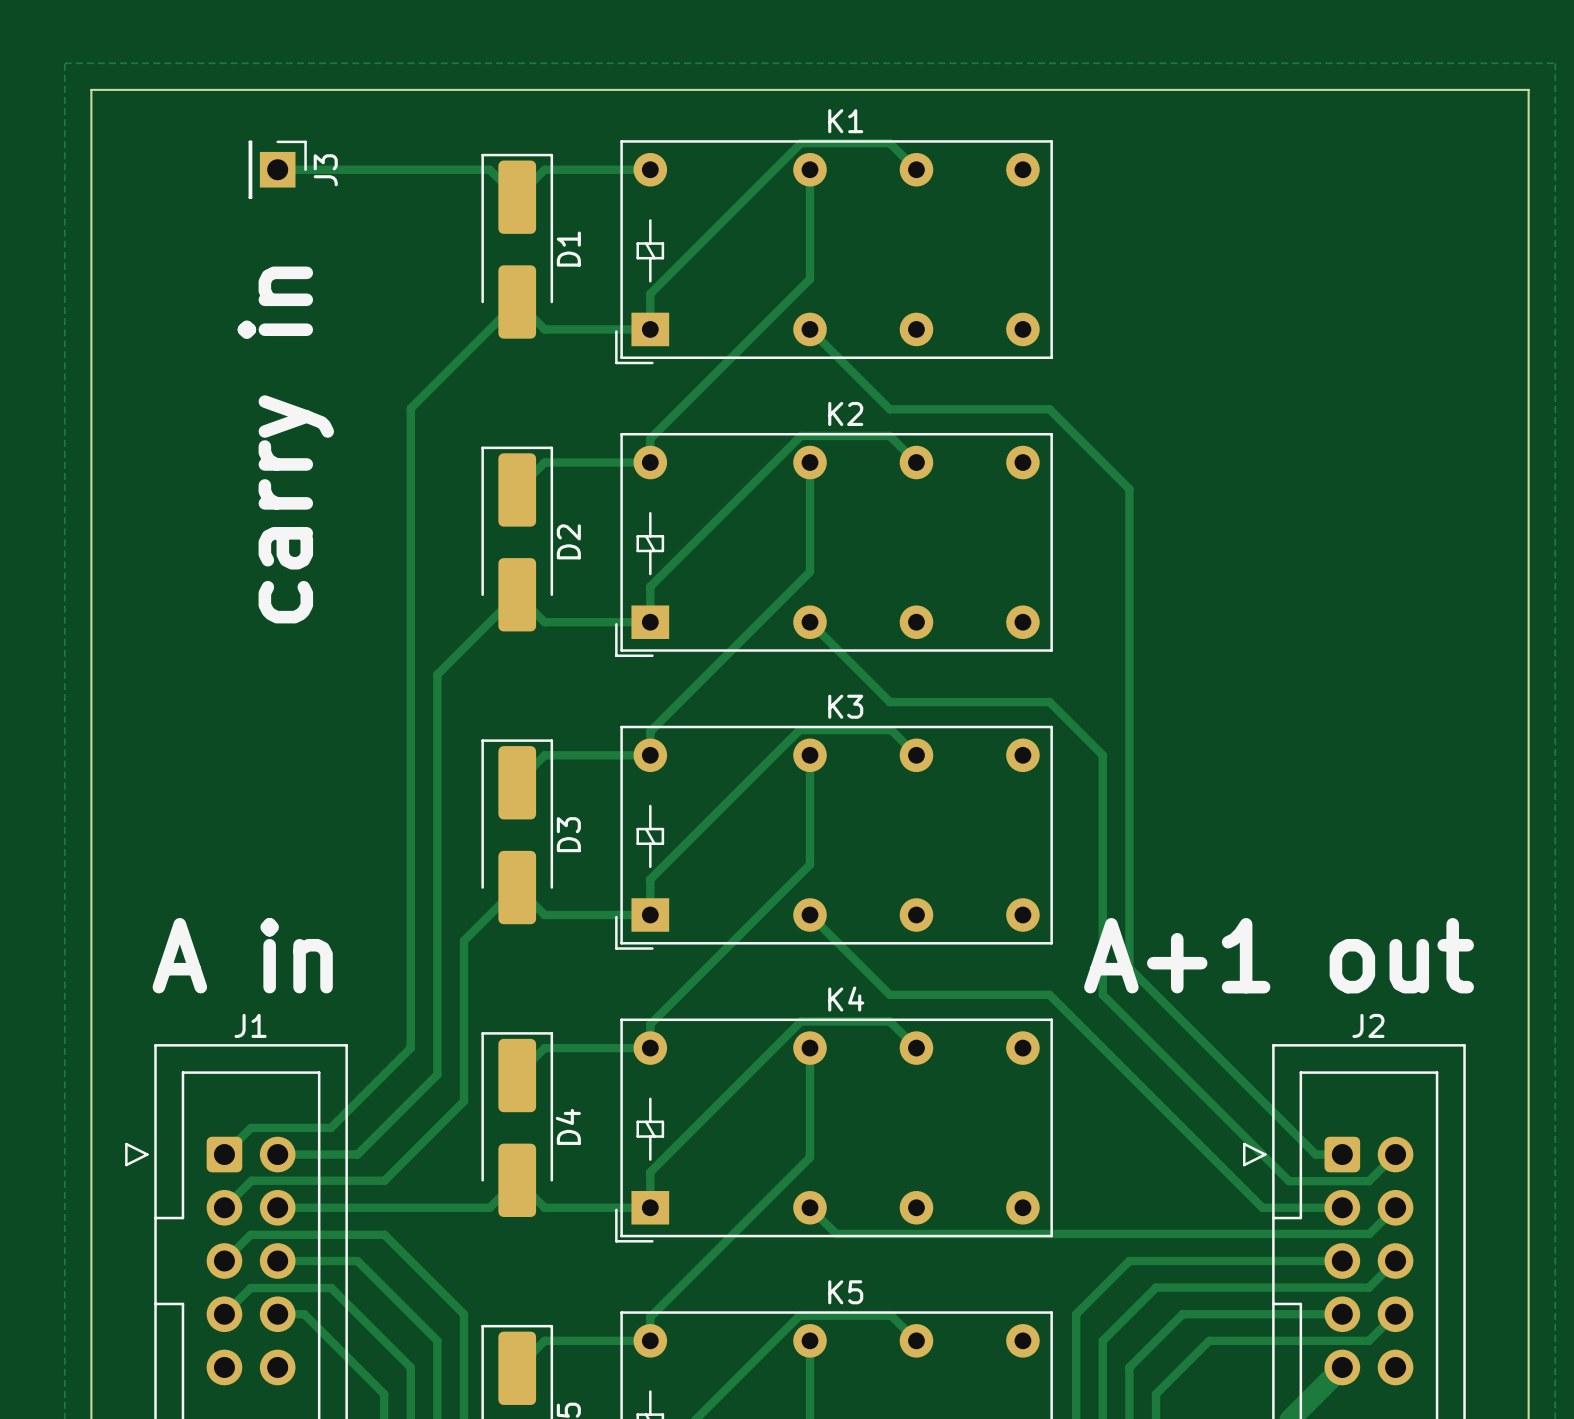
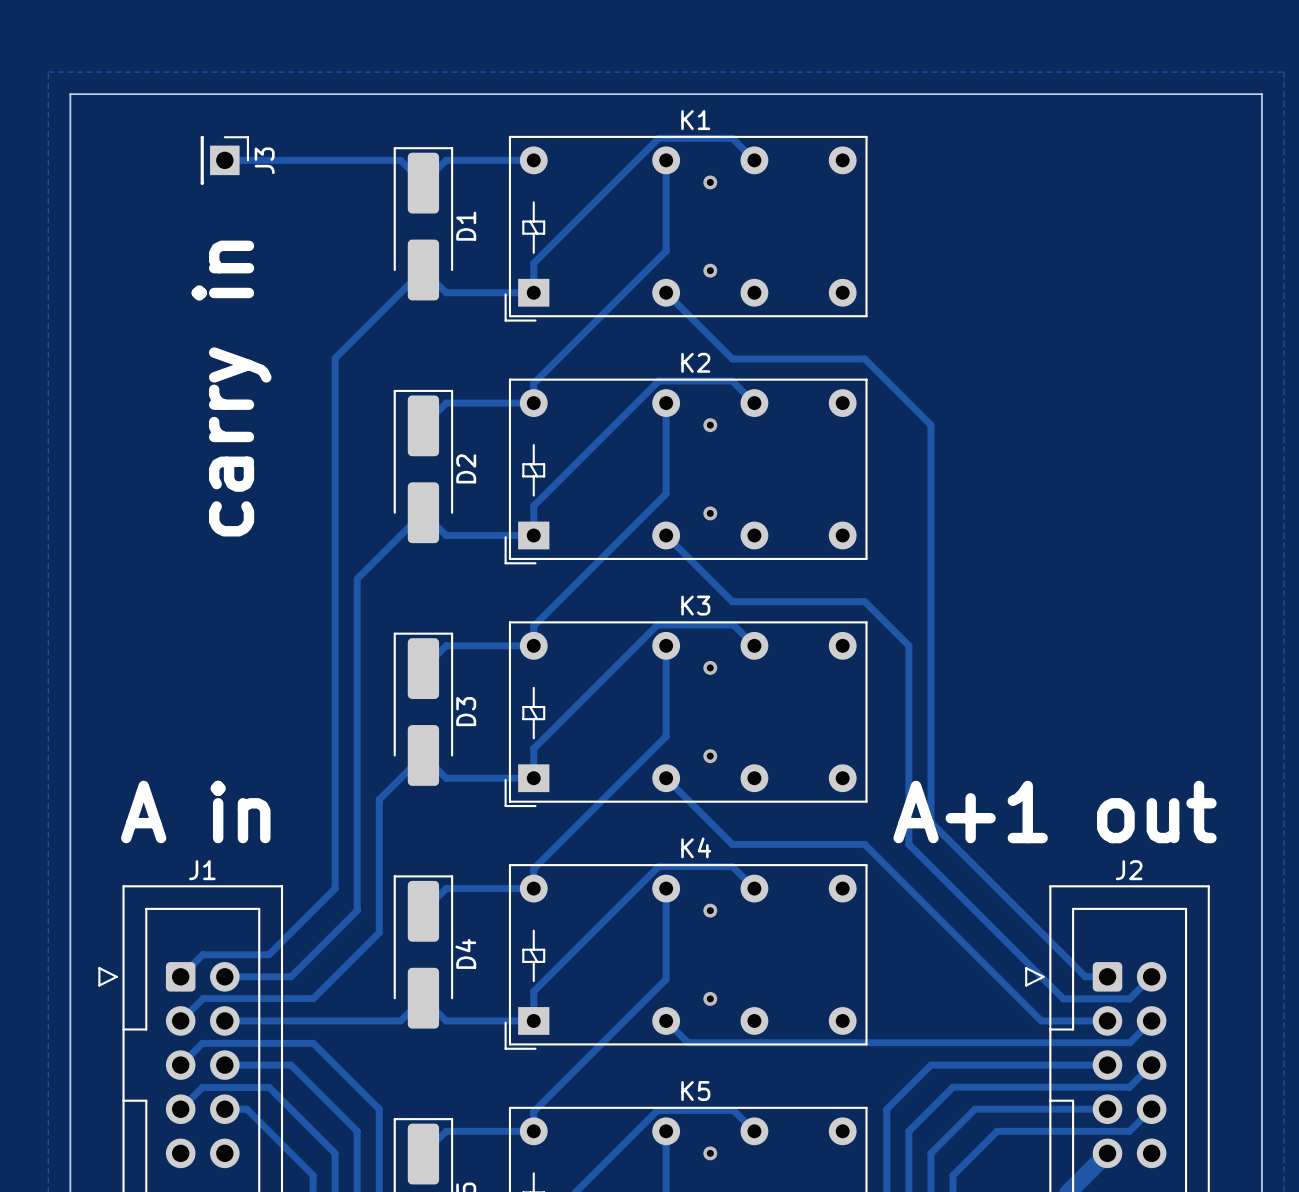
via: none -> (710, 182)
via: none -> (710, 270)
via: none -> (710, 425)
via: none -> (710, 513)
via: none -> (710, 667)
via: none -> (710, 756)
via: none -> (710, 910)
via: none -> (710, 998)
via: none -> (710, 1153)

